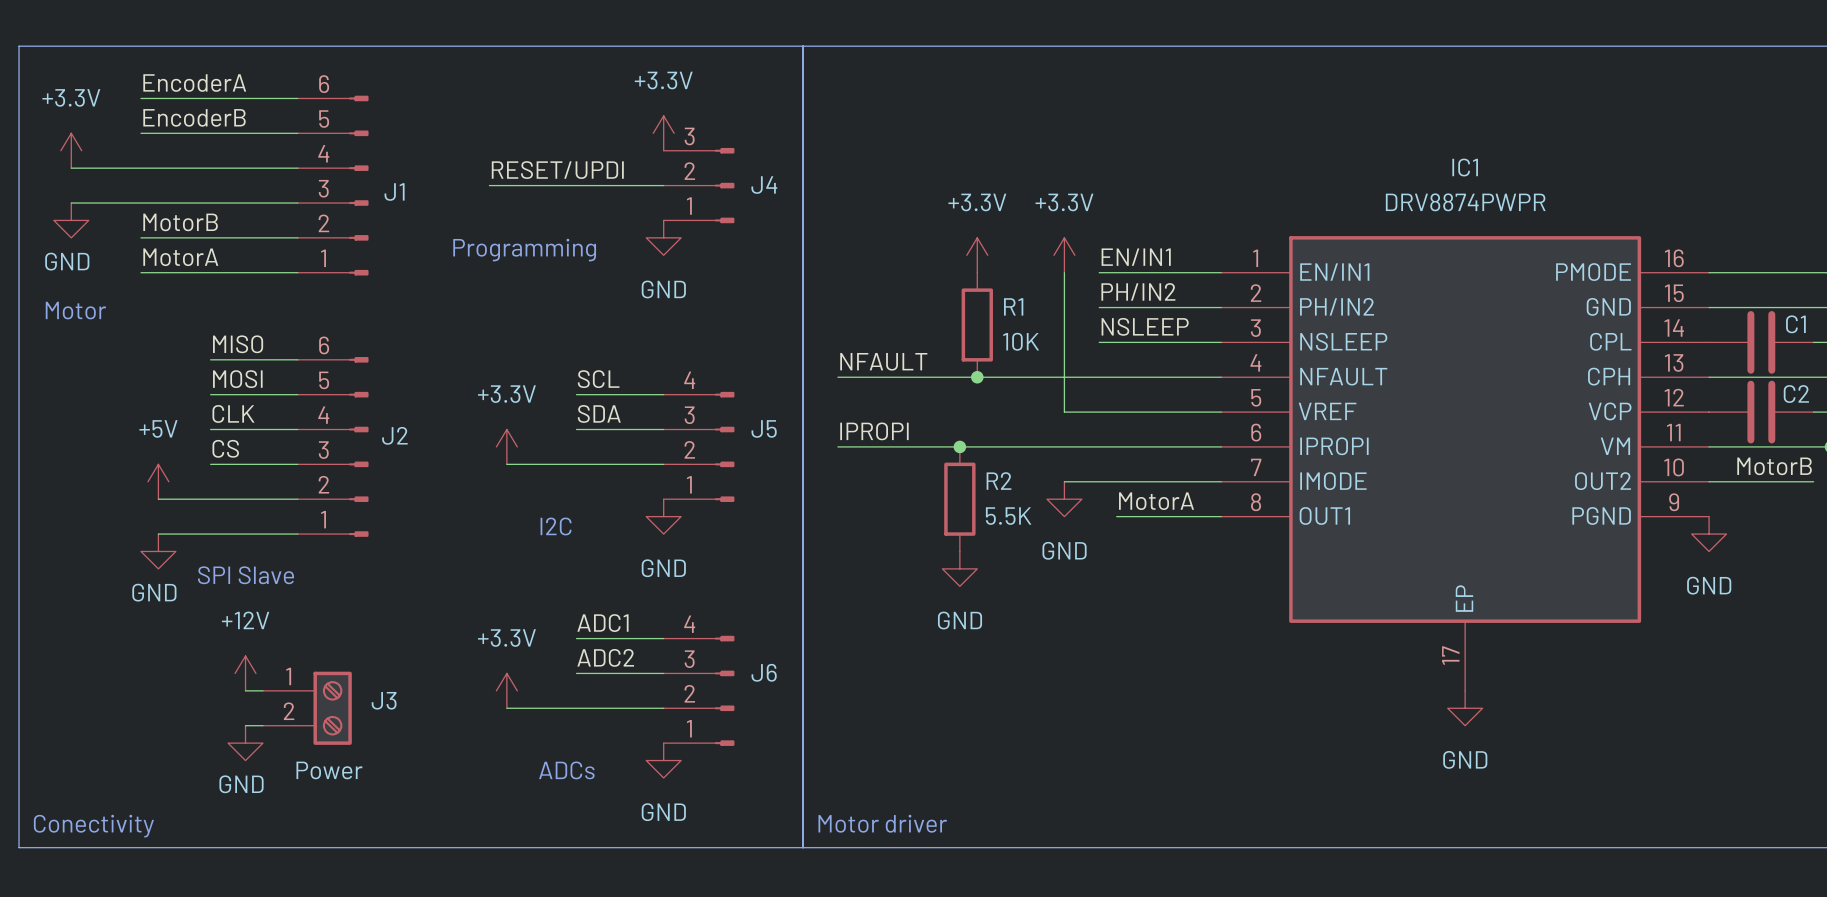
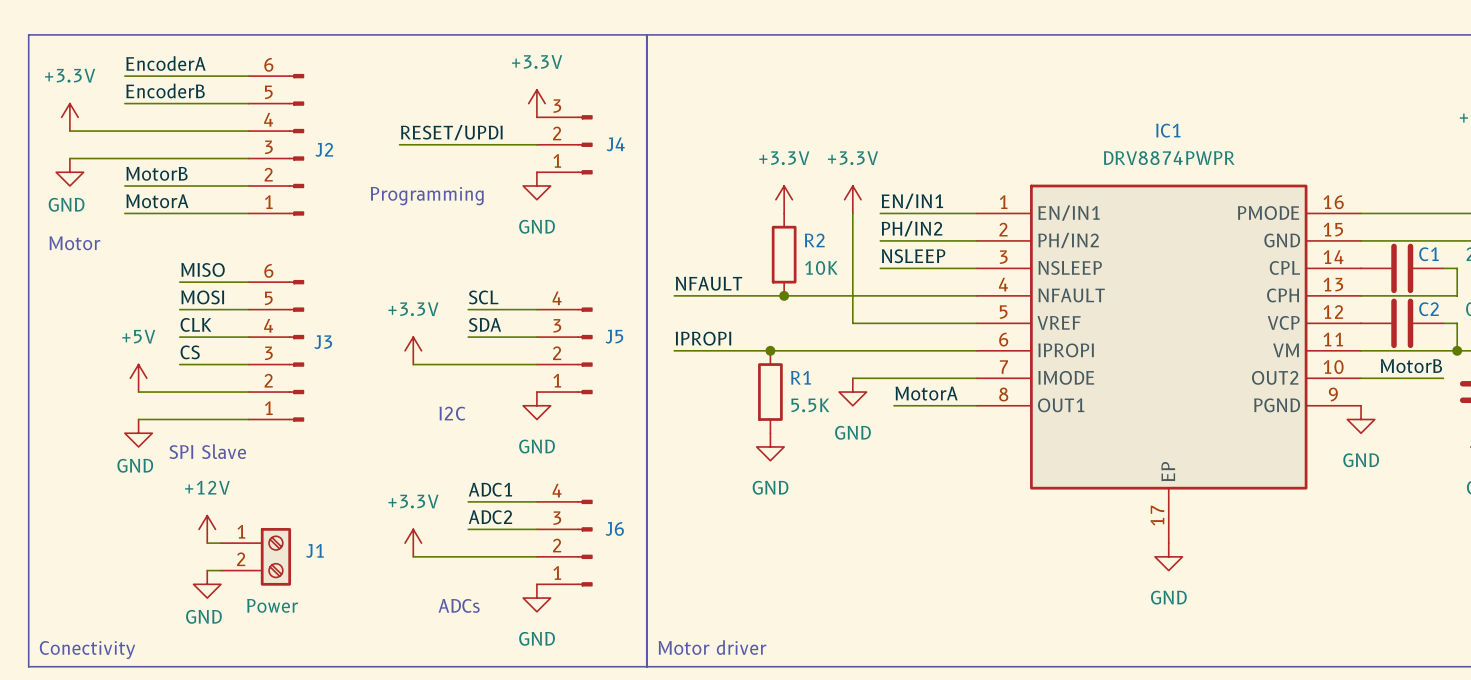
J1 name: J1 (394, 192) -> J2 (324, 149)
R1 name: R1 (1013, 306) -> R2 (814, 240)
J2 name: J2 (394, 435) -> J3 (323, 342)
R2 name: R2 (999, 481) -> R1 (800, 377)
J3 name: J3 (384, 700) -> J1 (314, 550)

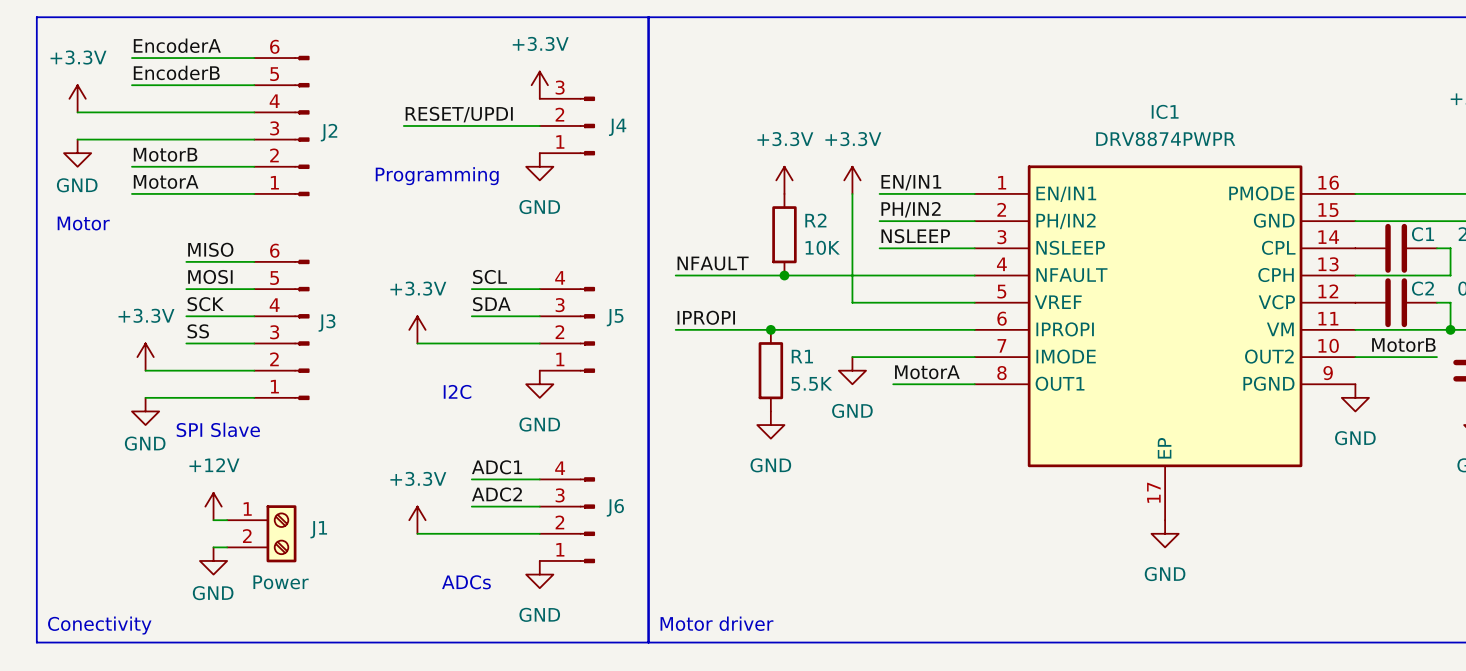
label: CLK (195, 324) -> SCK (205, 304)
label: CS (190, 352) -> SS (198, 331)
power symbol: +5V (138, 378) -> +3.3V (145, 357)

